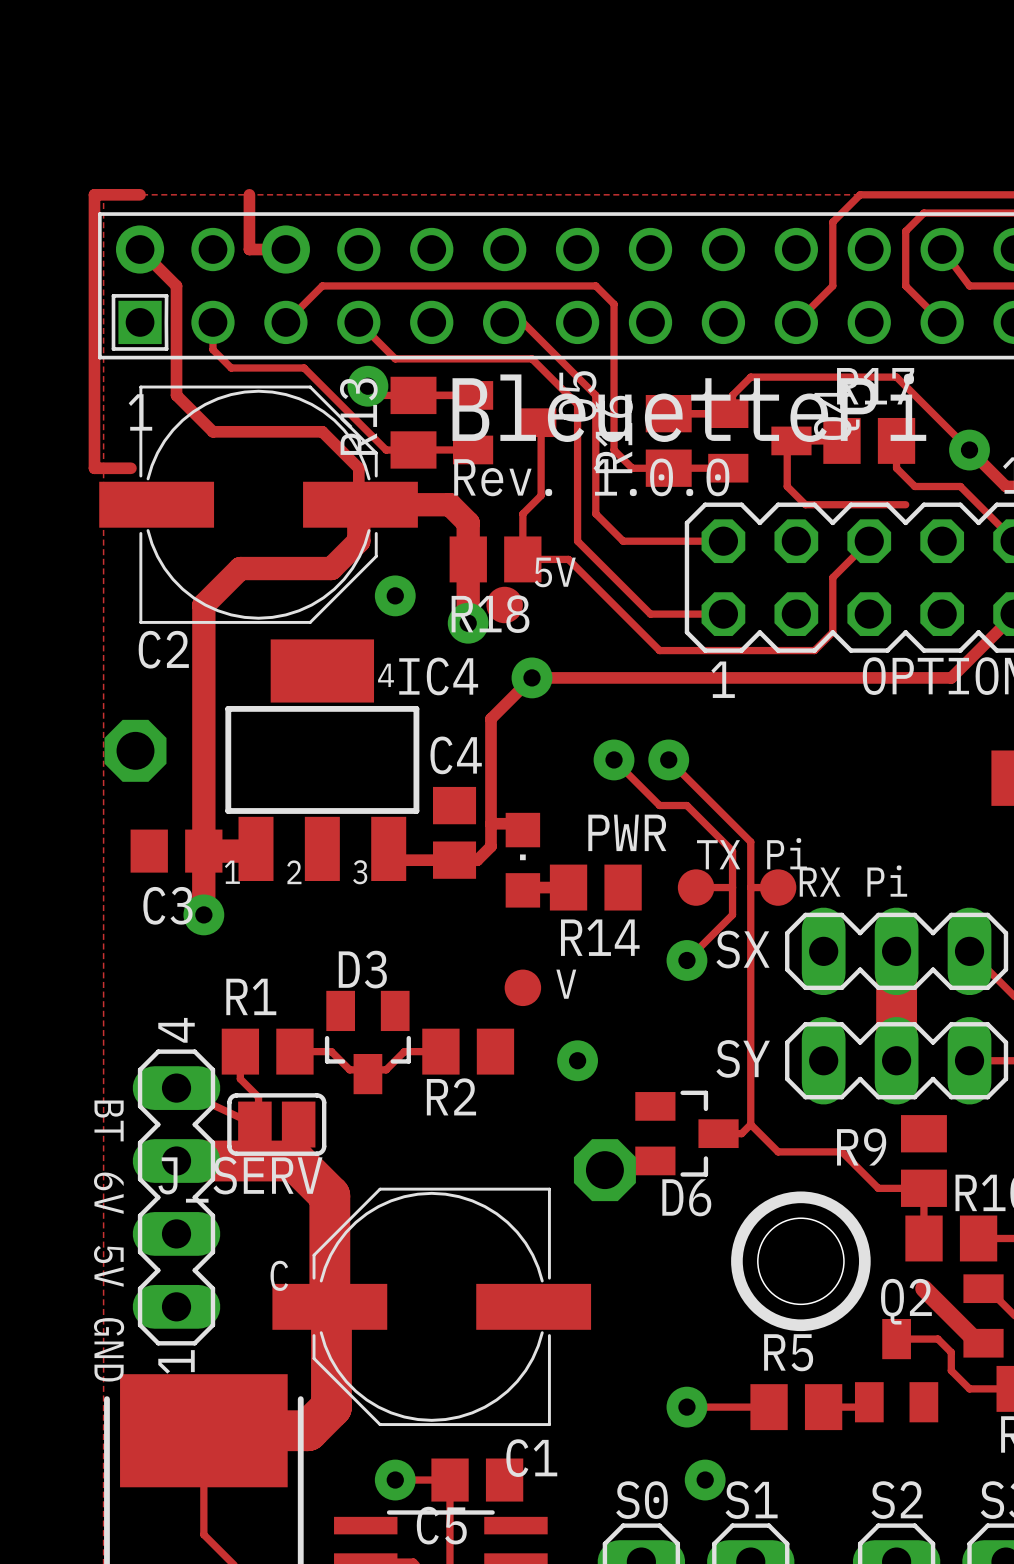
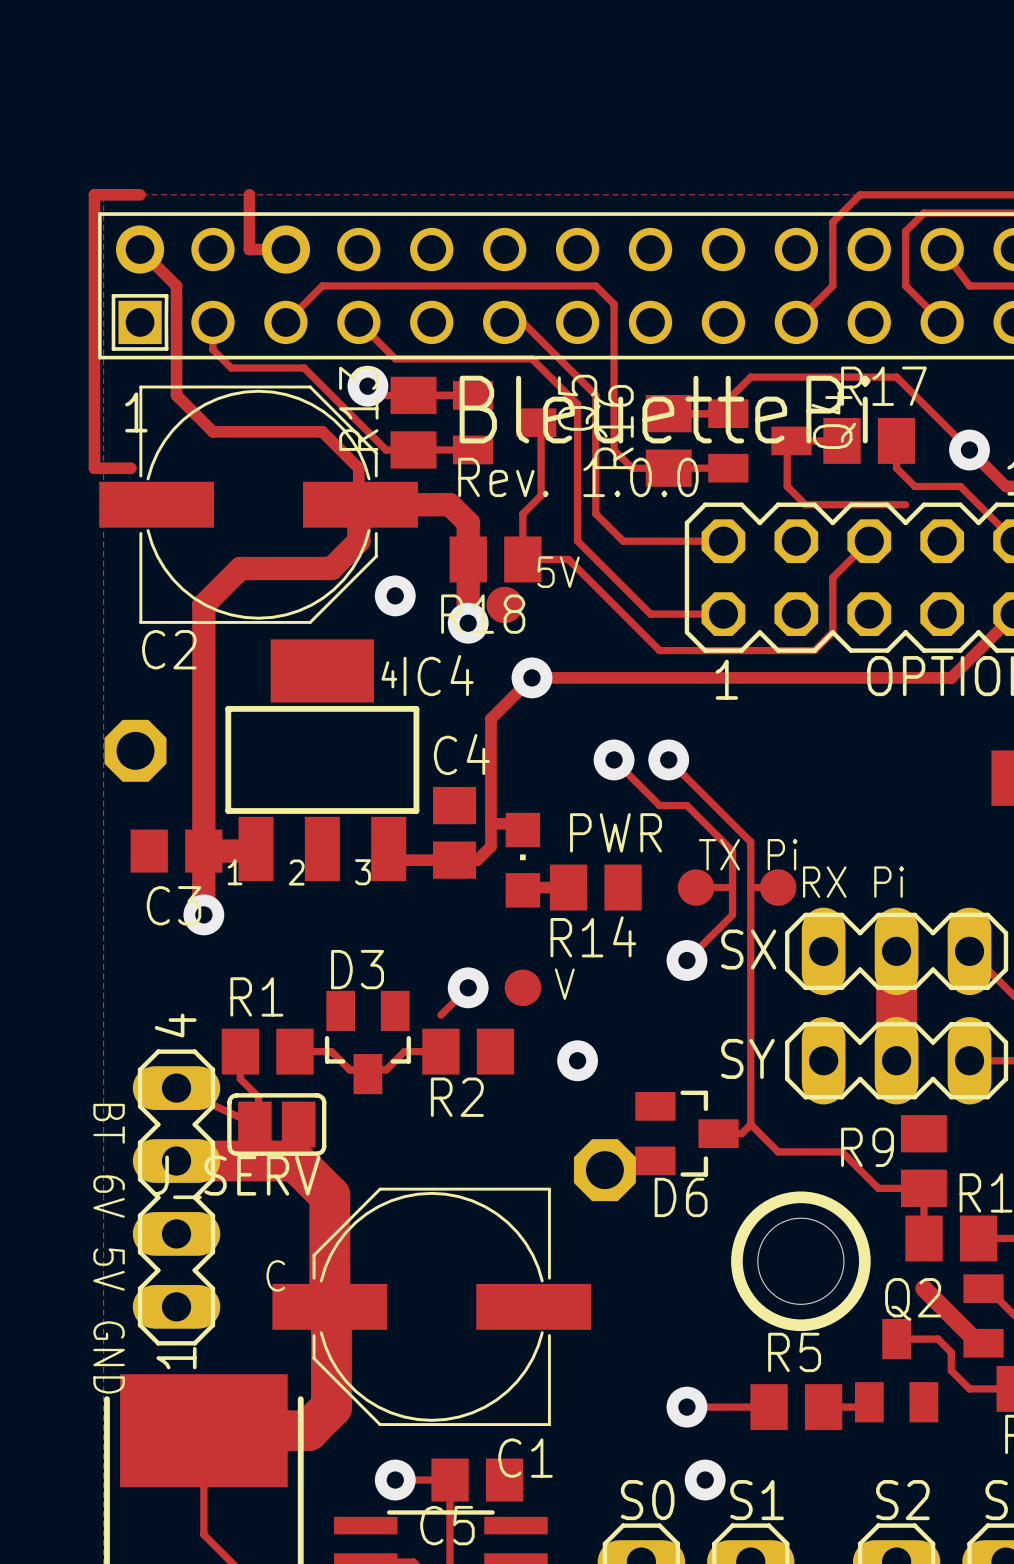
track: none -> (468, 987) (440, 1015)
via: none -> (468, 987)

